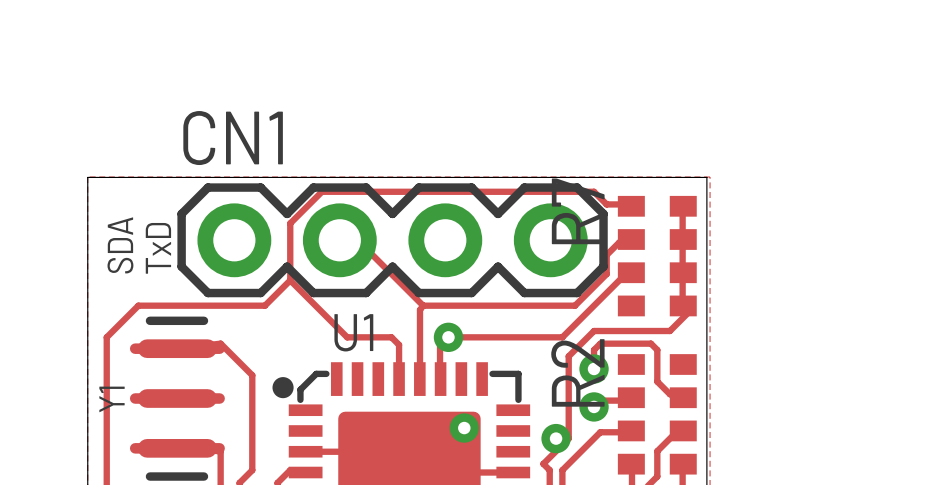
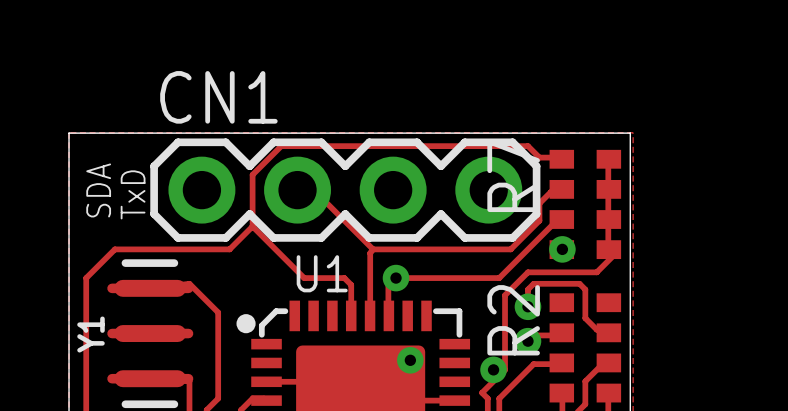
via: none -> (562, 249)

